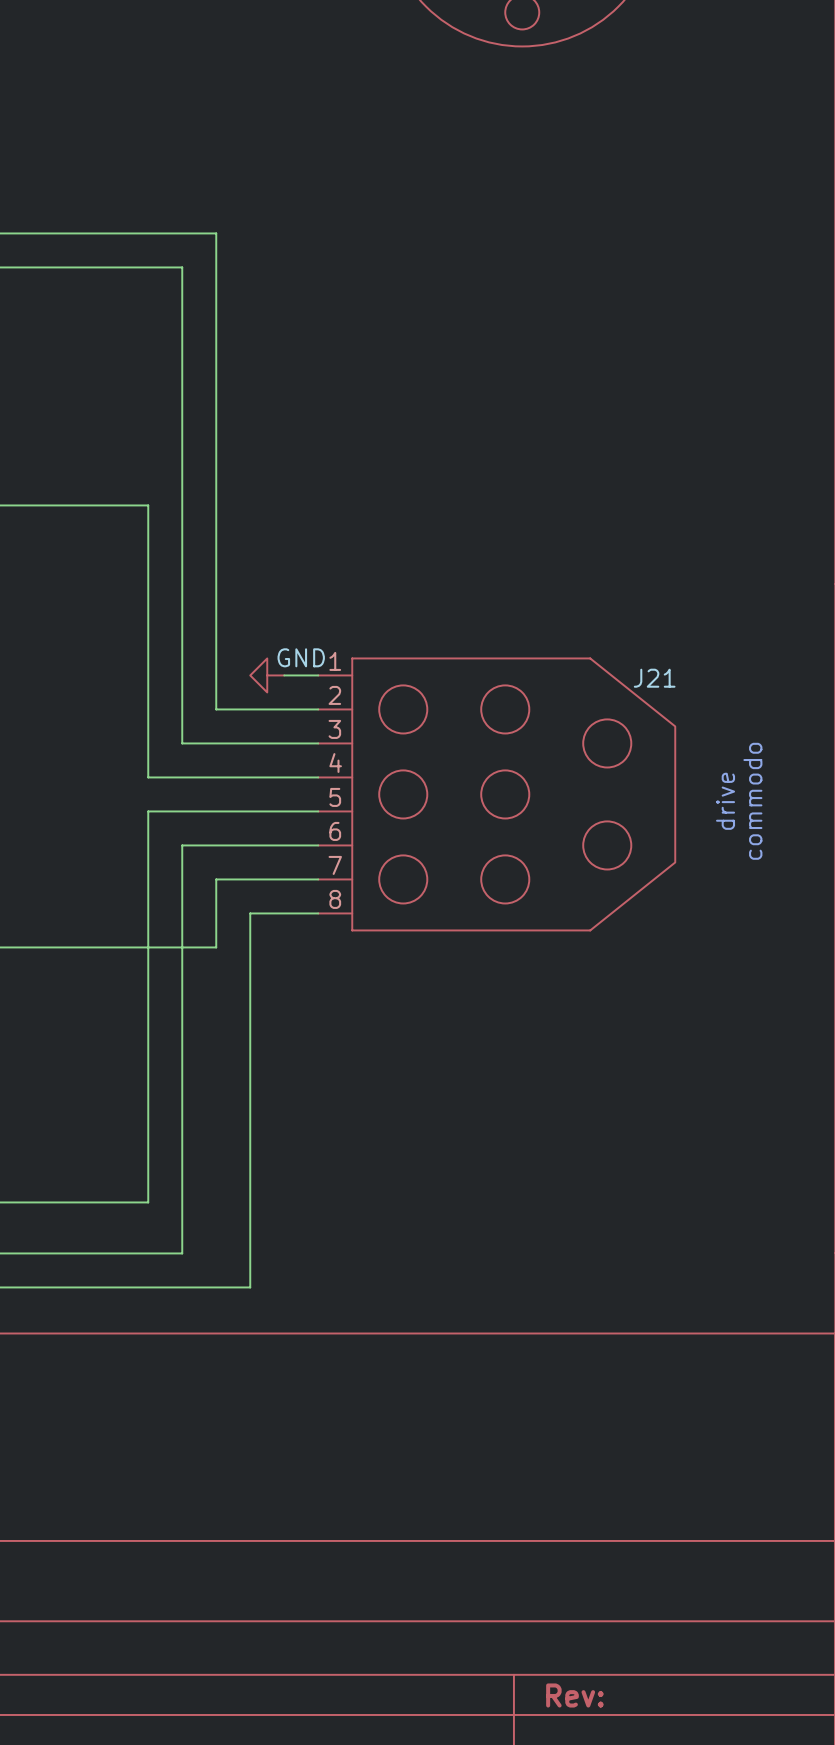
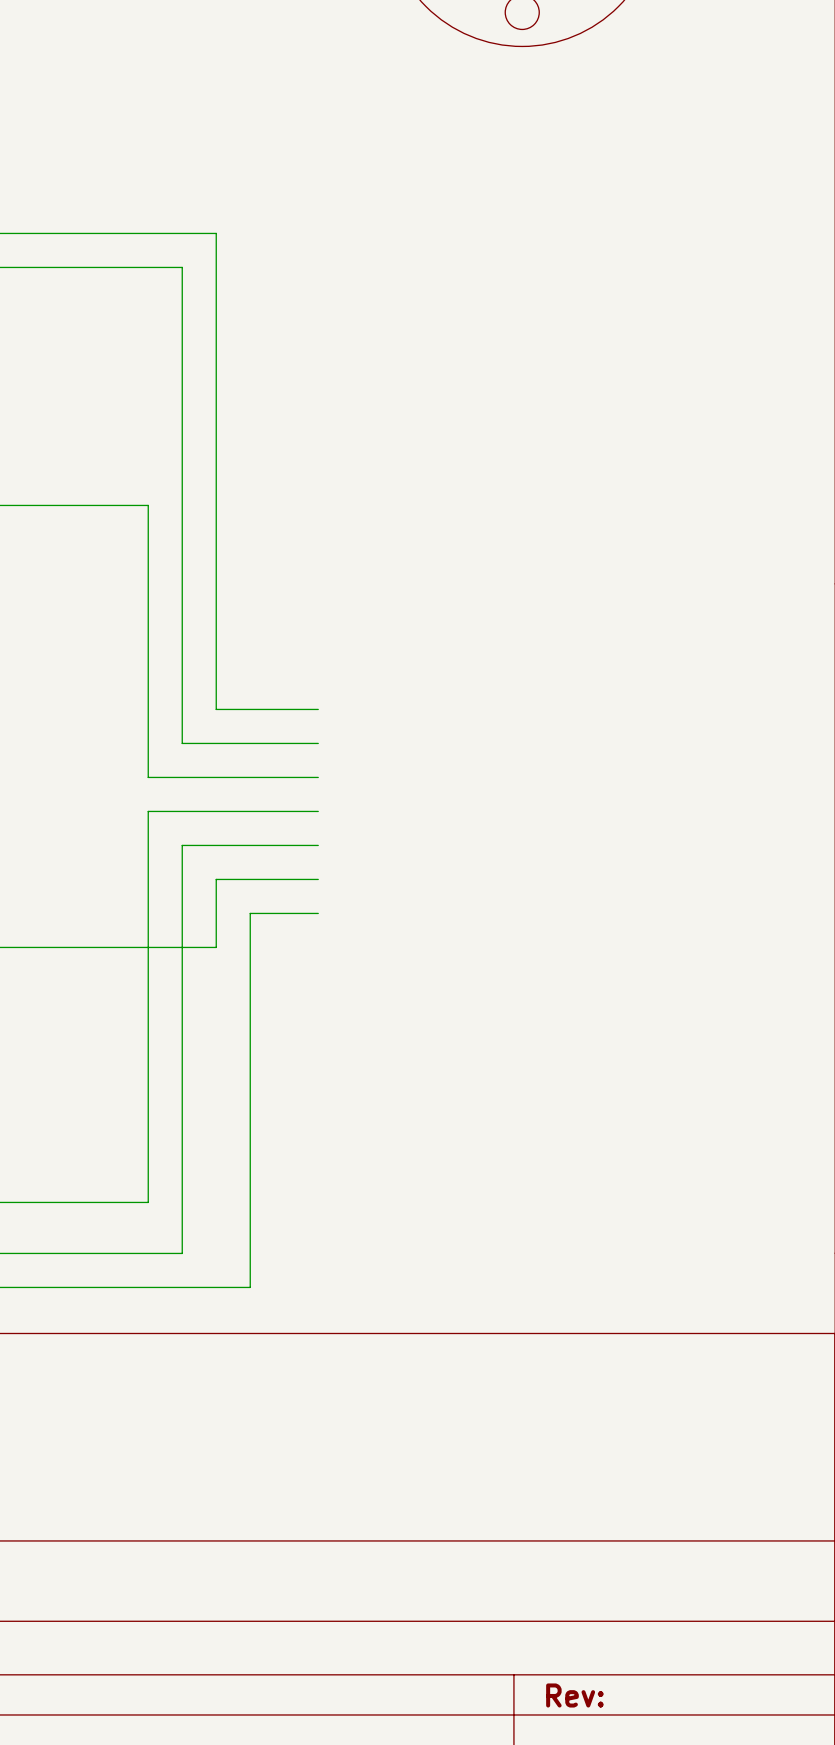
power symbol: GND (267, 675) -> none
wire: (284, 675) (318, 675) -> none
J21: (496, 794) -> none
text: drive (725, 801) -> none
text: commodo (752, 801) -> none

